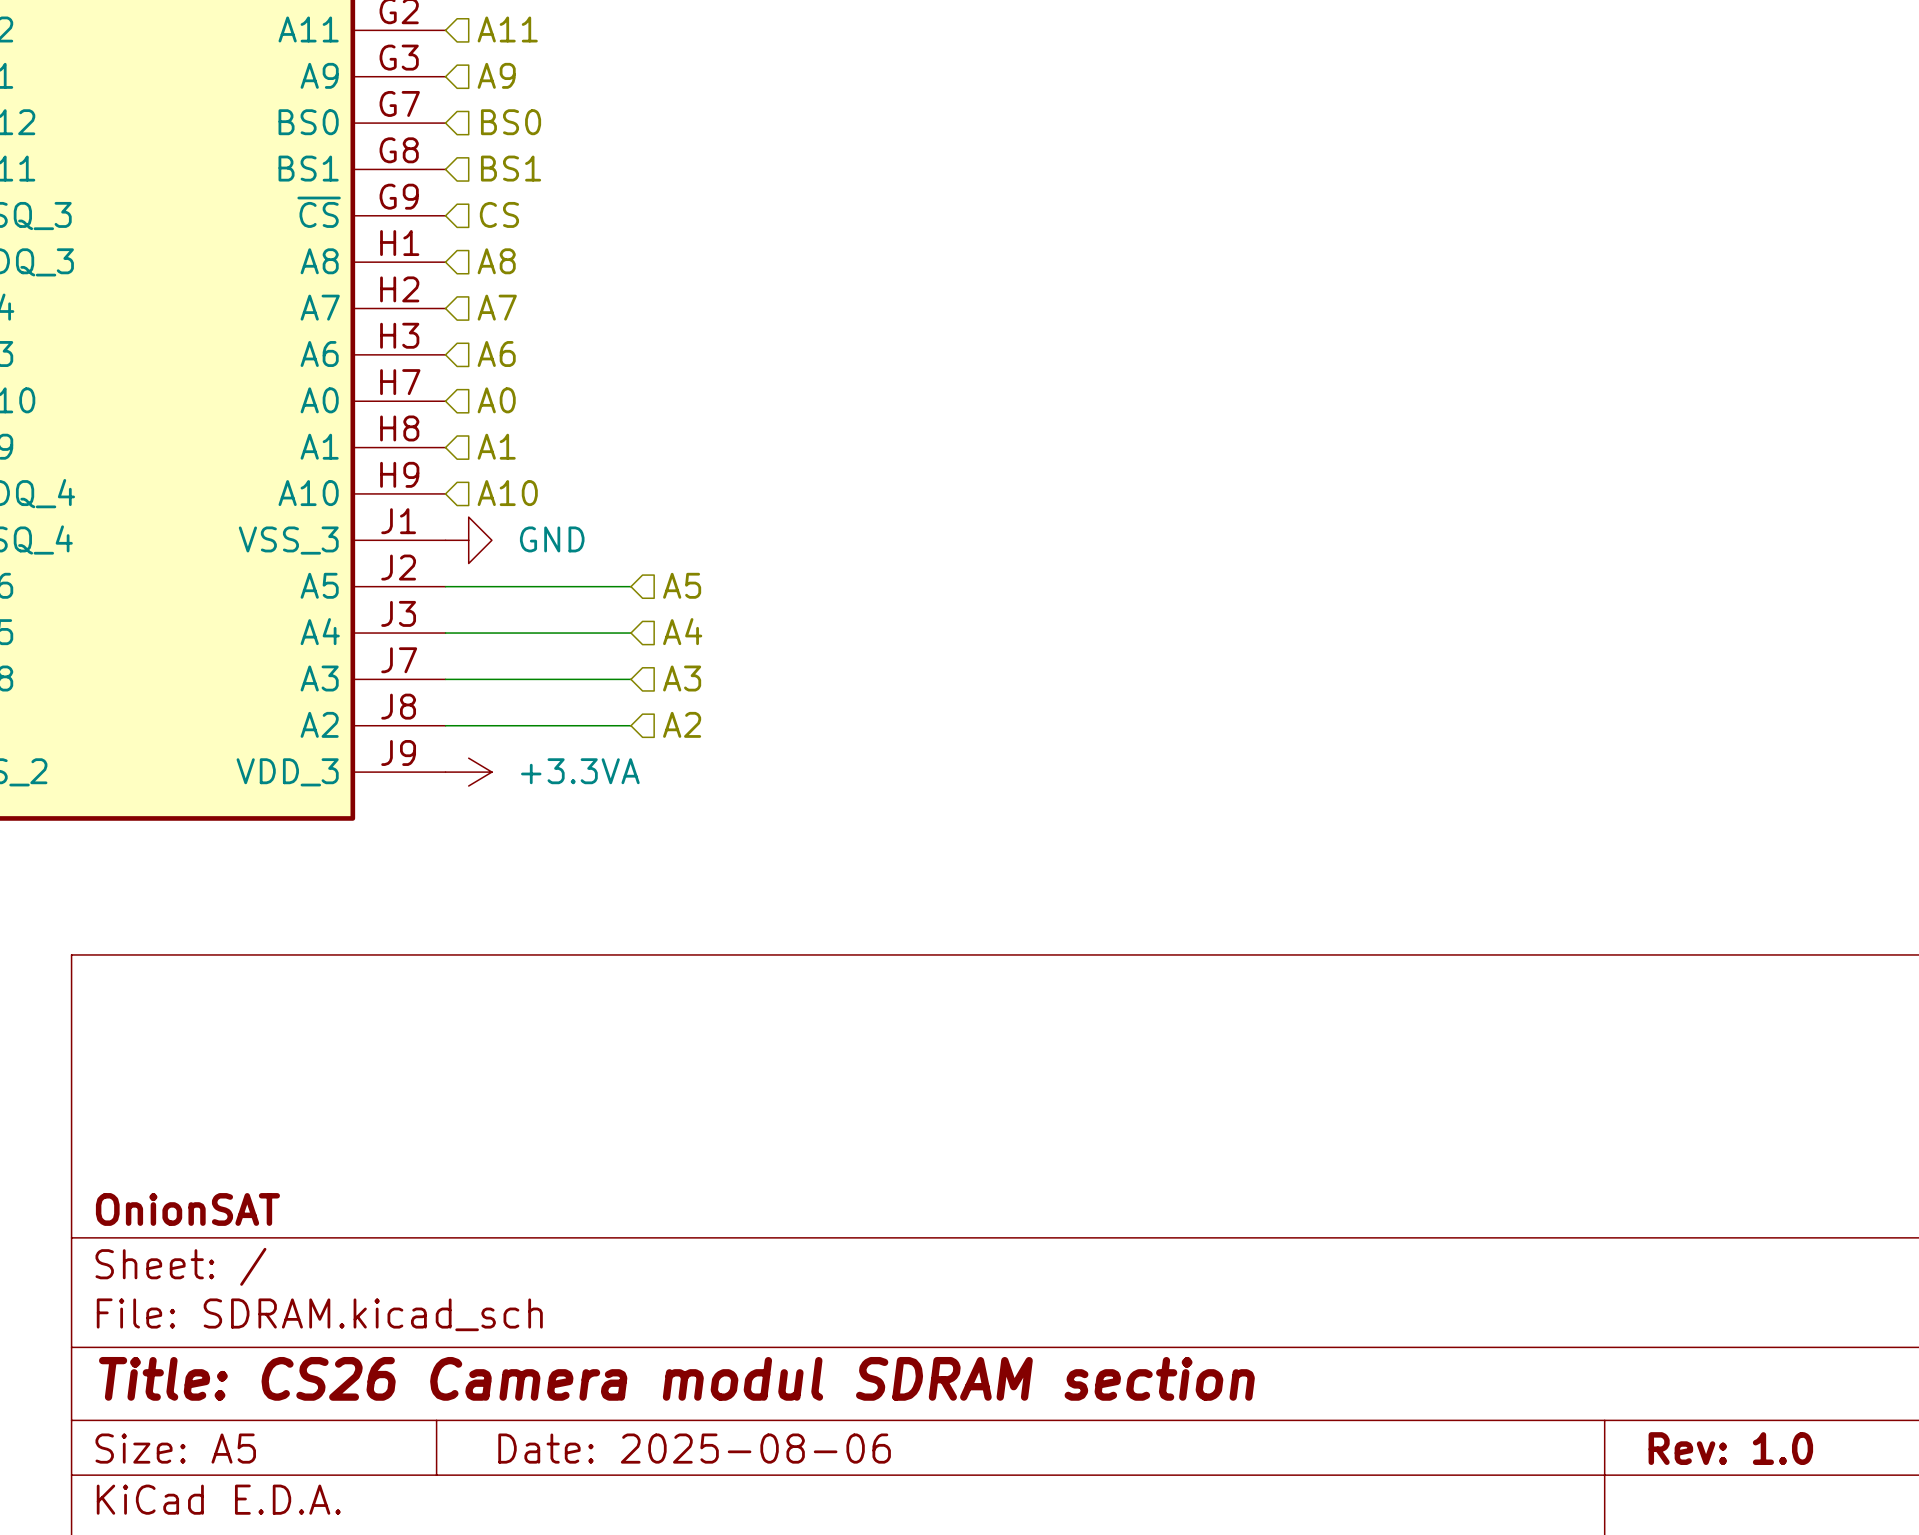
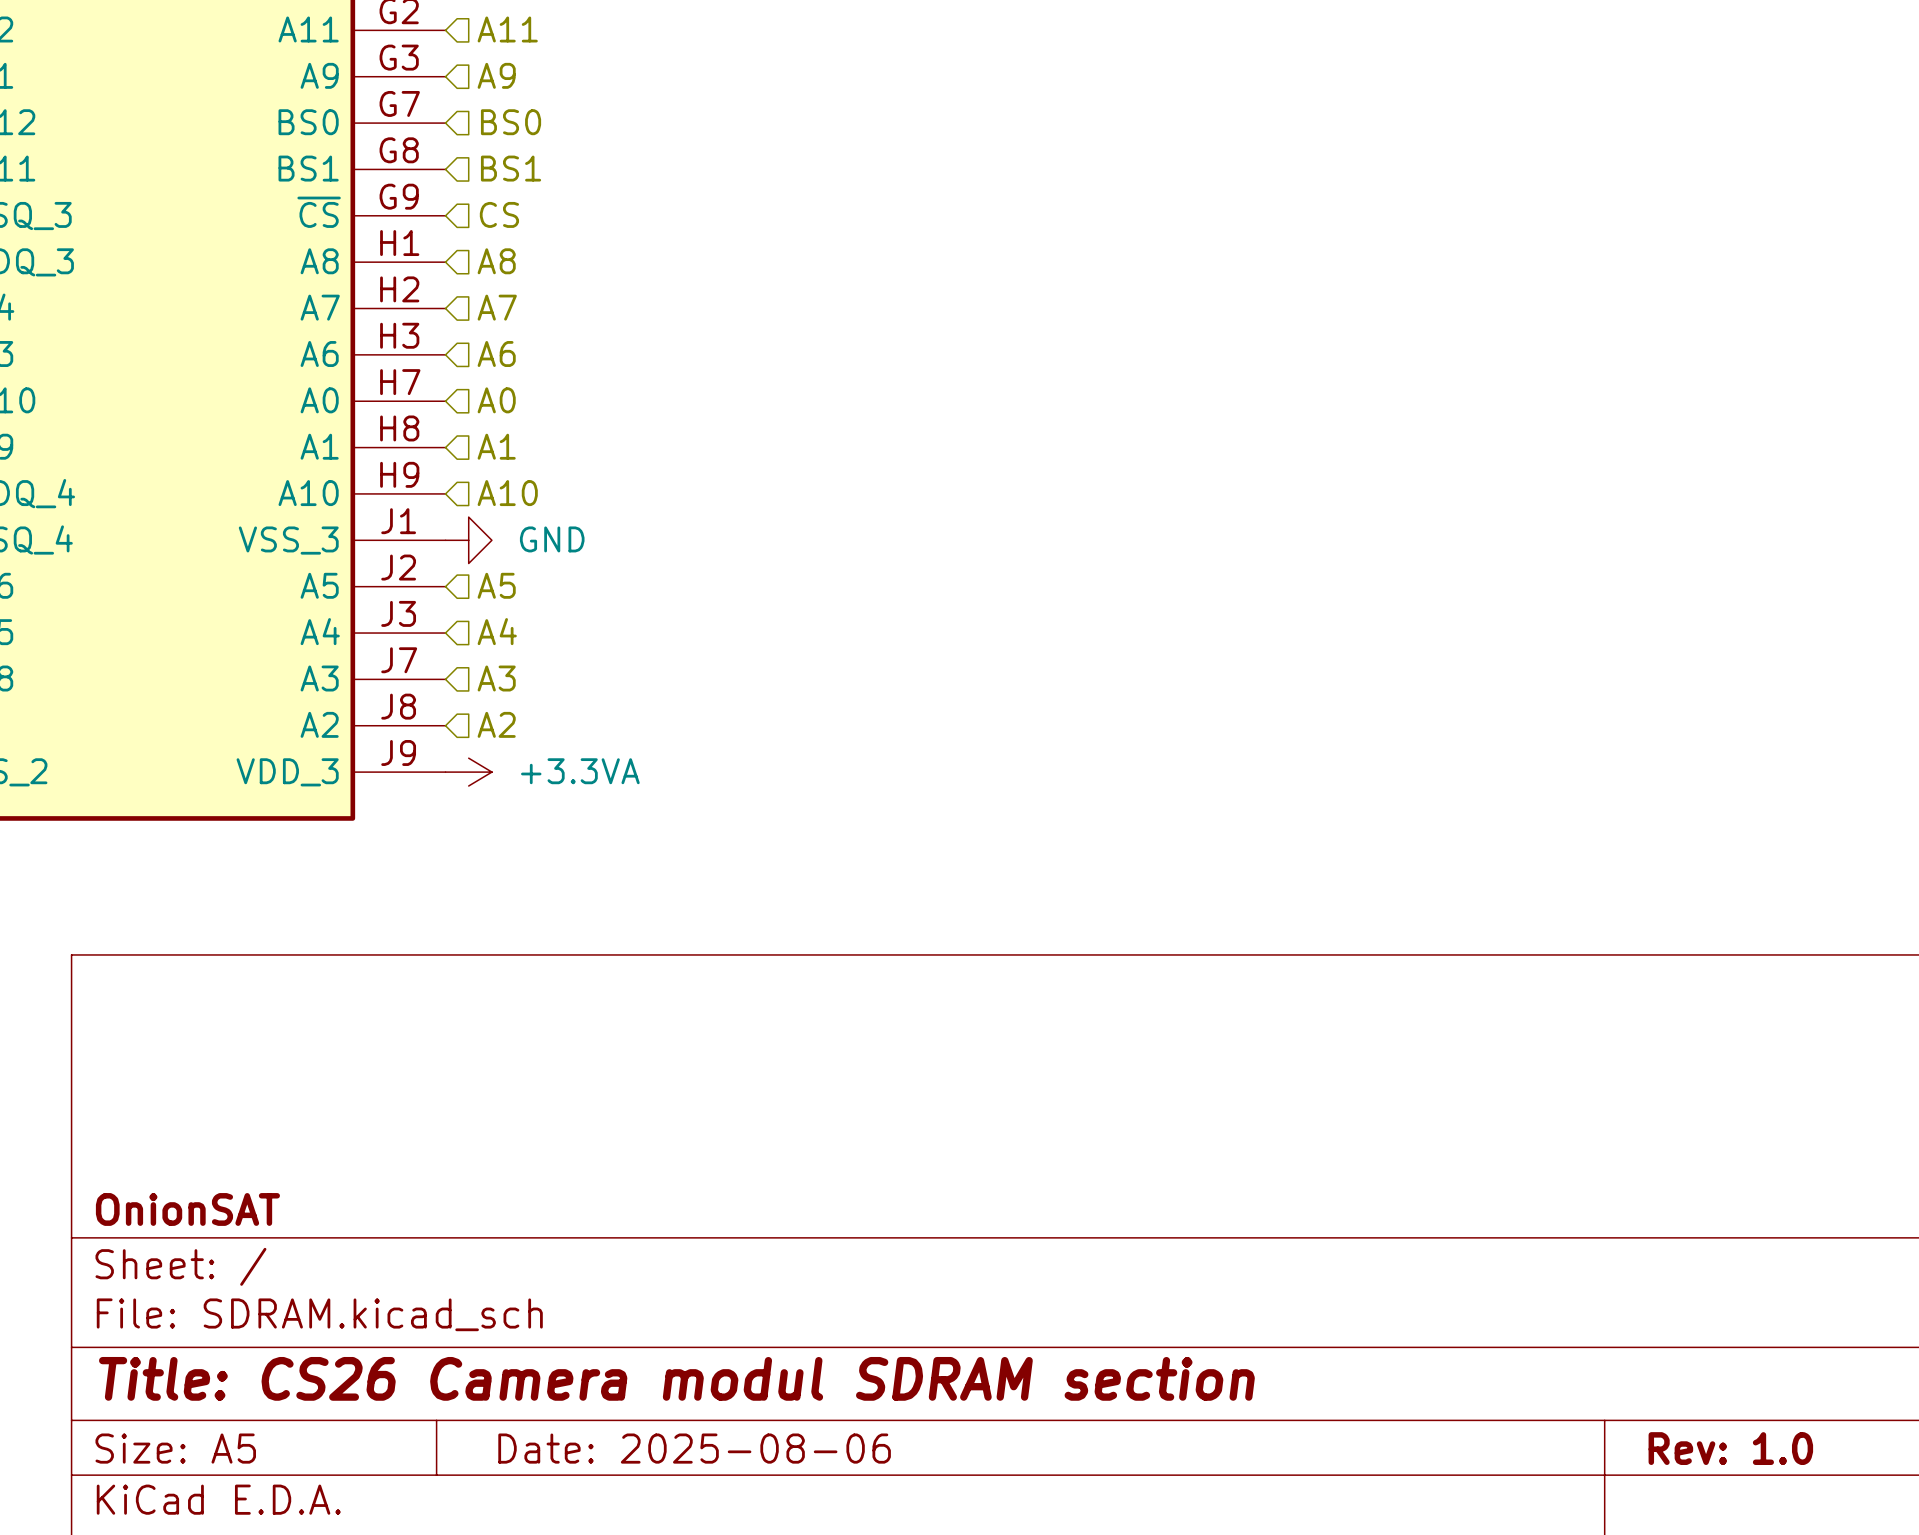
hierarchical label position: A5 (682, 585) -> A5 (496, 585)
wire: (445, 586) (630, 586) -> none
hierarchical label position: A4 (682, 631) -> A4 (497, 631)
wire: (445, 633) (630, 633) -> none
hierarchical label position: A3 (682, 678) -> A3 (496, 678)
wire: (445, 679) (630, 679) -> none
hierarchical label position: A2 (682, 724) -> A2 (496, 724)
wire: (445, 725) (630, 725) -> none

